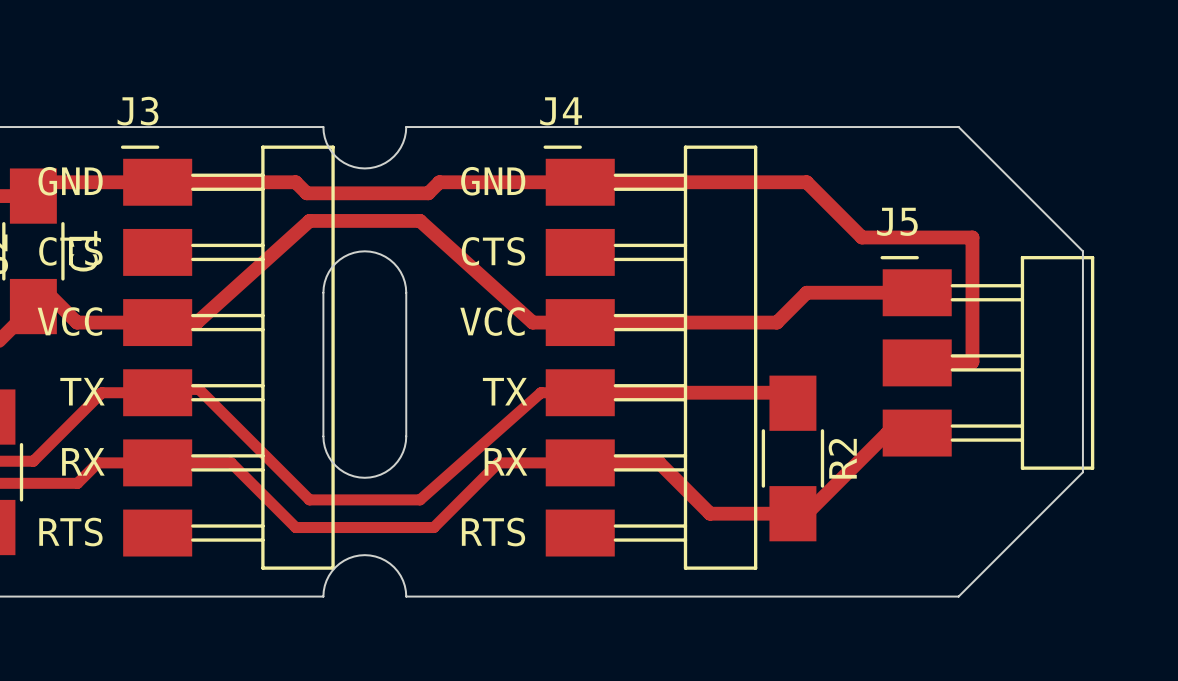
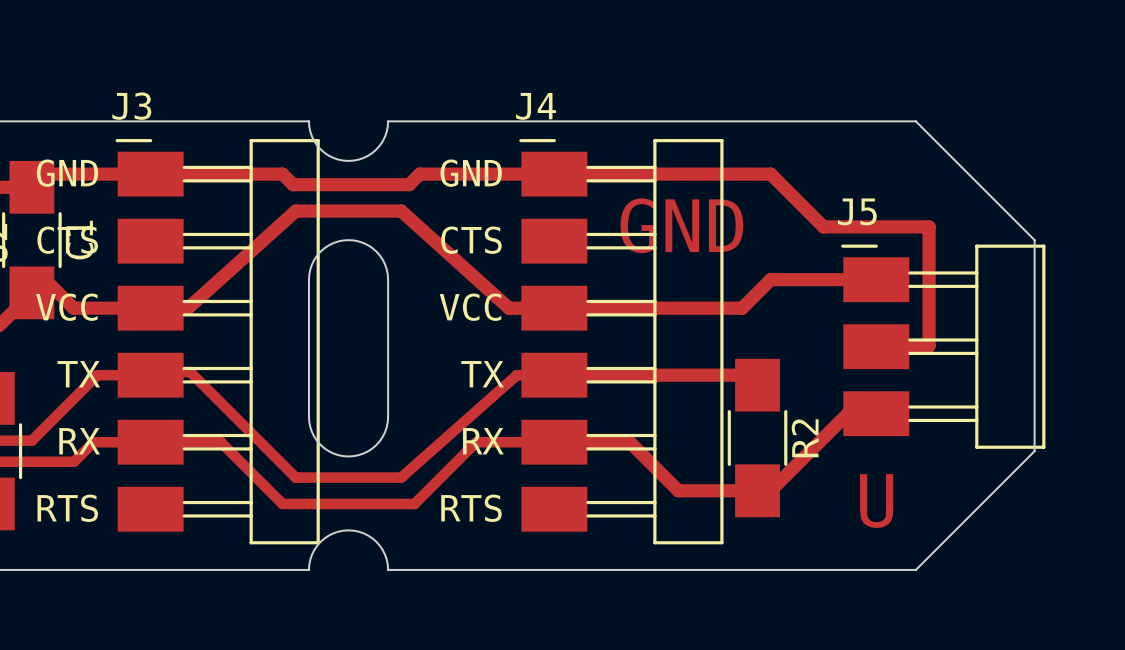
text: none -> GND (681, 225)
text: none -> U (876, 501)

